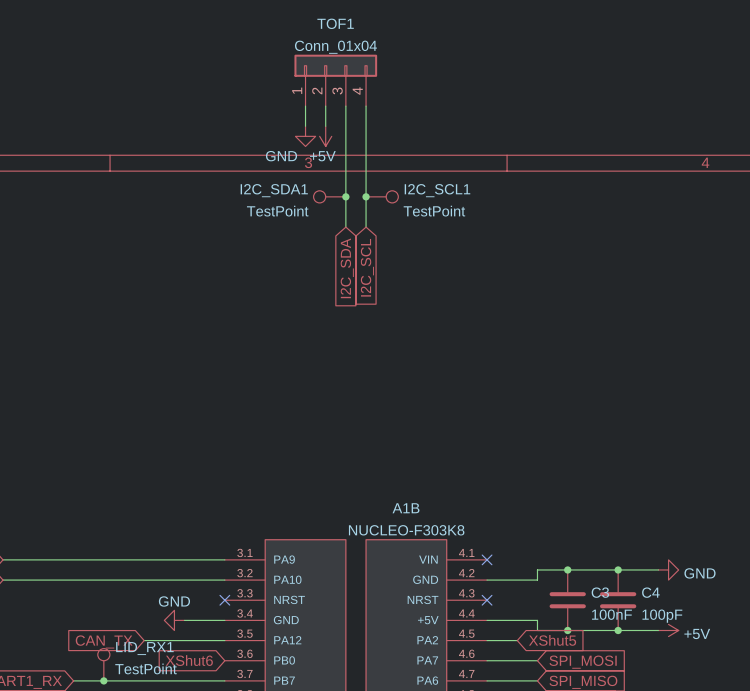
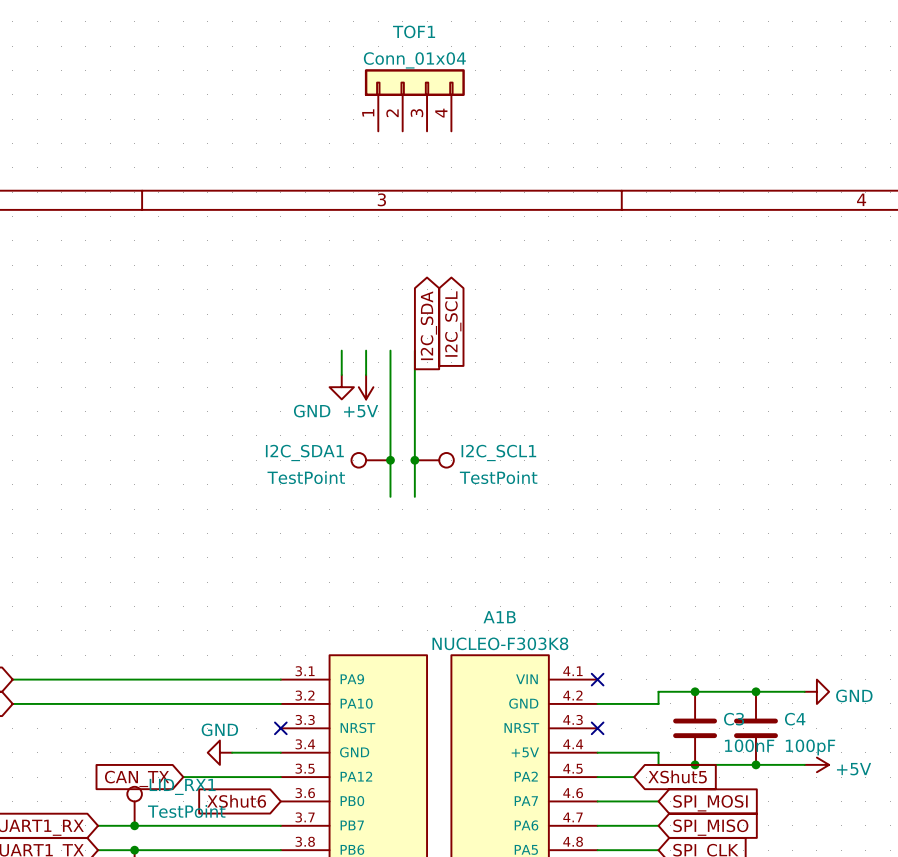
wire: (305, 106) (305, 126) -> (341, 350) (341, 375)
wire: (325, 106) (325, 126) -> (366, 350) (366, 375)
wire: (345, 106) (345, 227) -> (390, 350) (390, 496)
wire: (366, 106) (366, 227) -> (414, 350) (414, 496)
power symbol position: GND (305, 136) -> GND (341, 387)
power symbol position: +5V (325, 136) -> +5V (366, 387)
I2C_SDA1 position: (329, 196) -> (370, 460)
junction: (345, 196) -> none
junction: (366, 196) -> none
I2C_SCL1 position: (382, 196) -> (434, 460)
junction: none -> (390, 460)
junction: none -> (414, 460)

